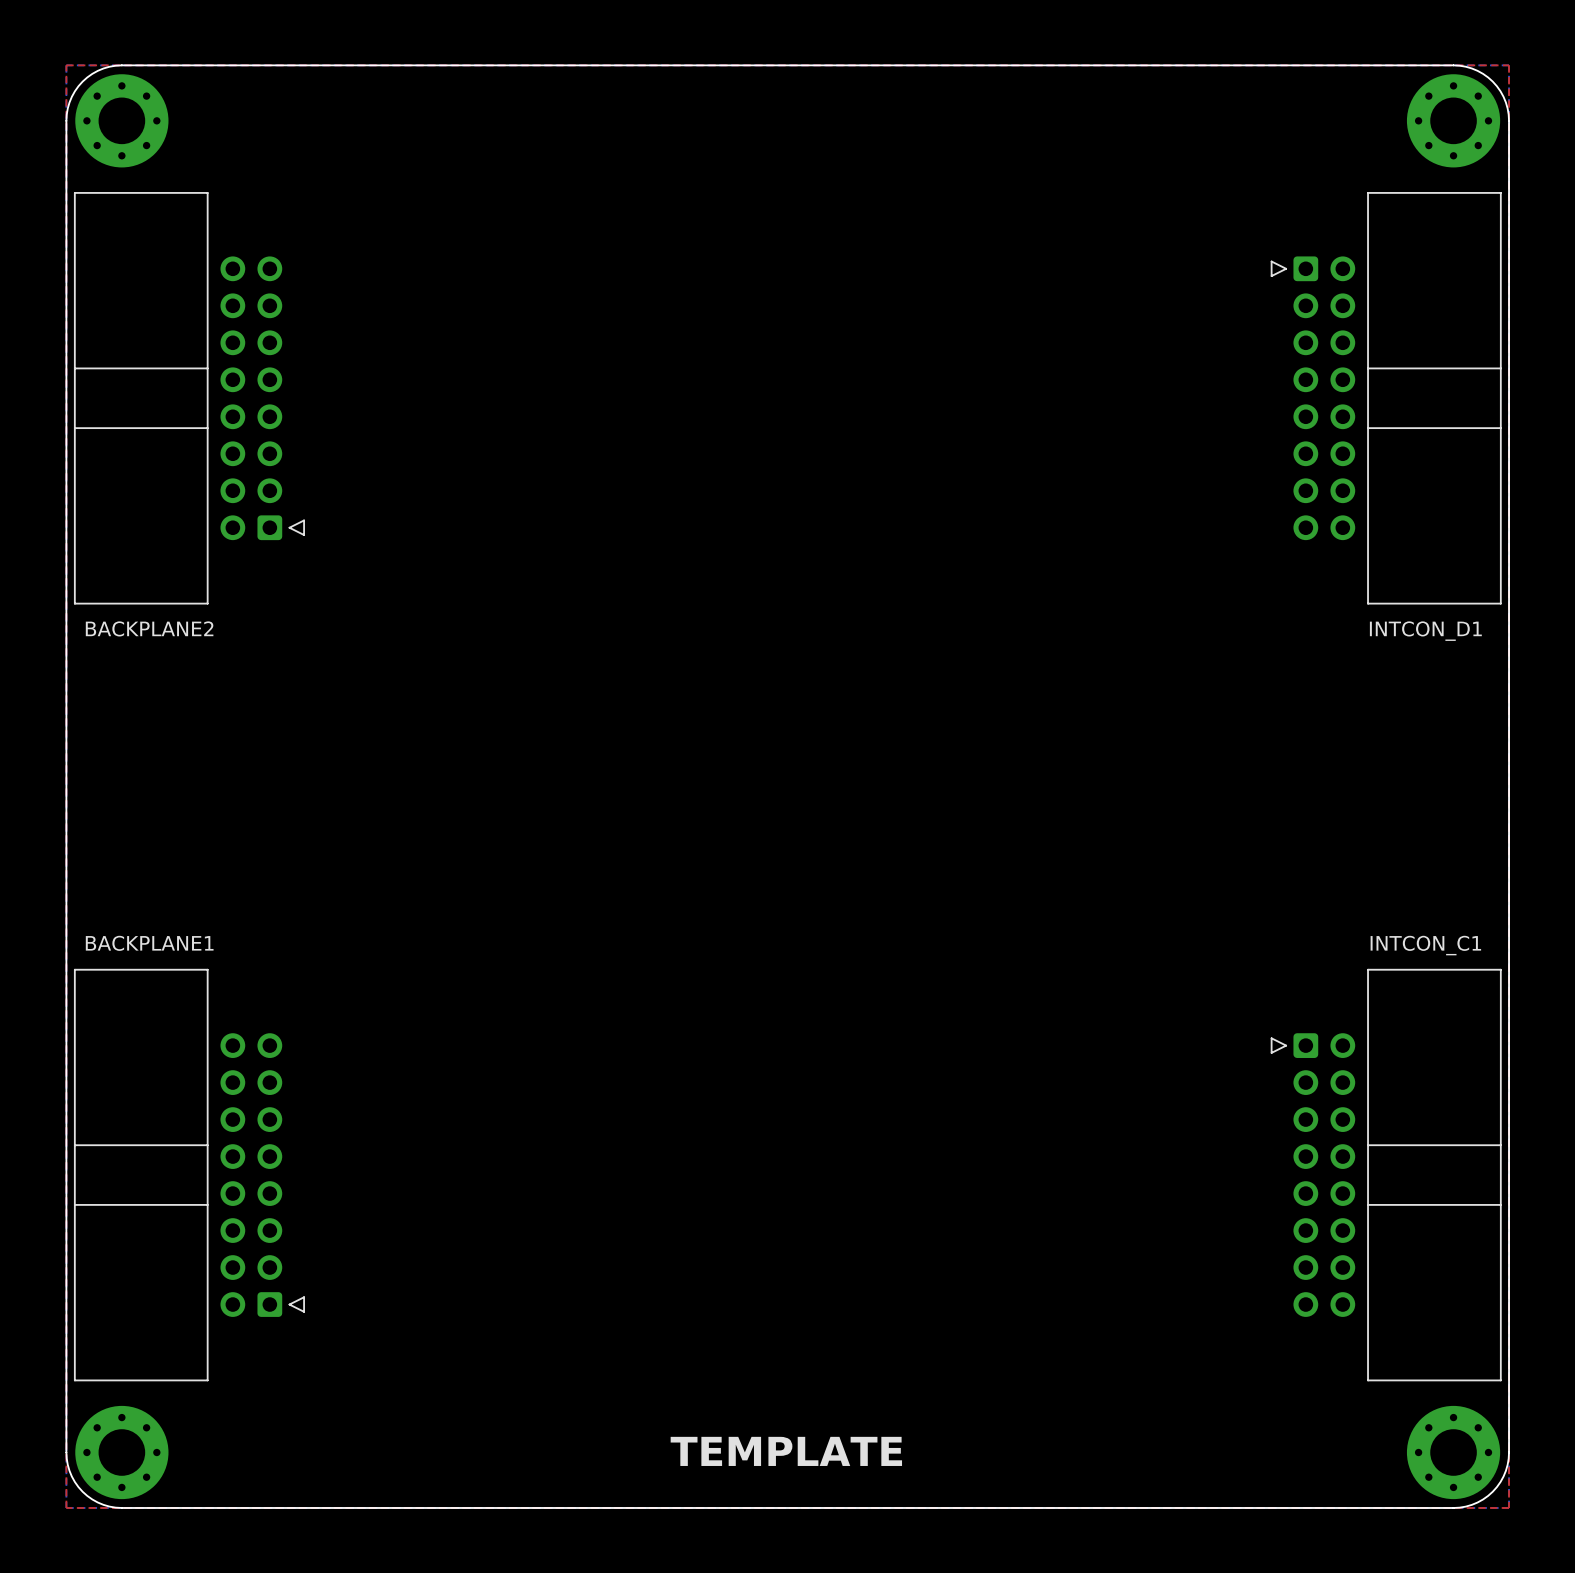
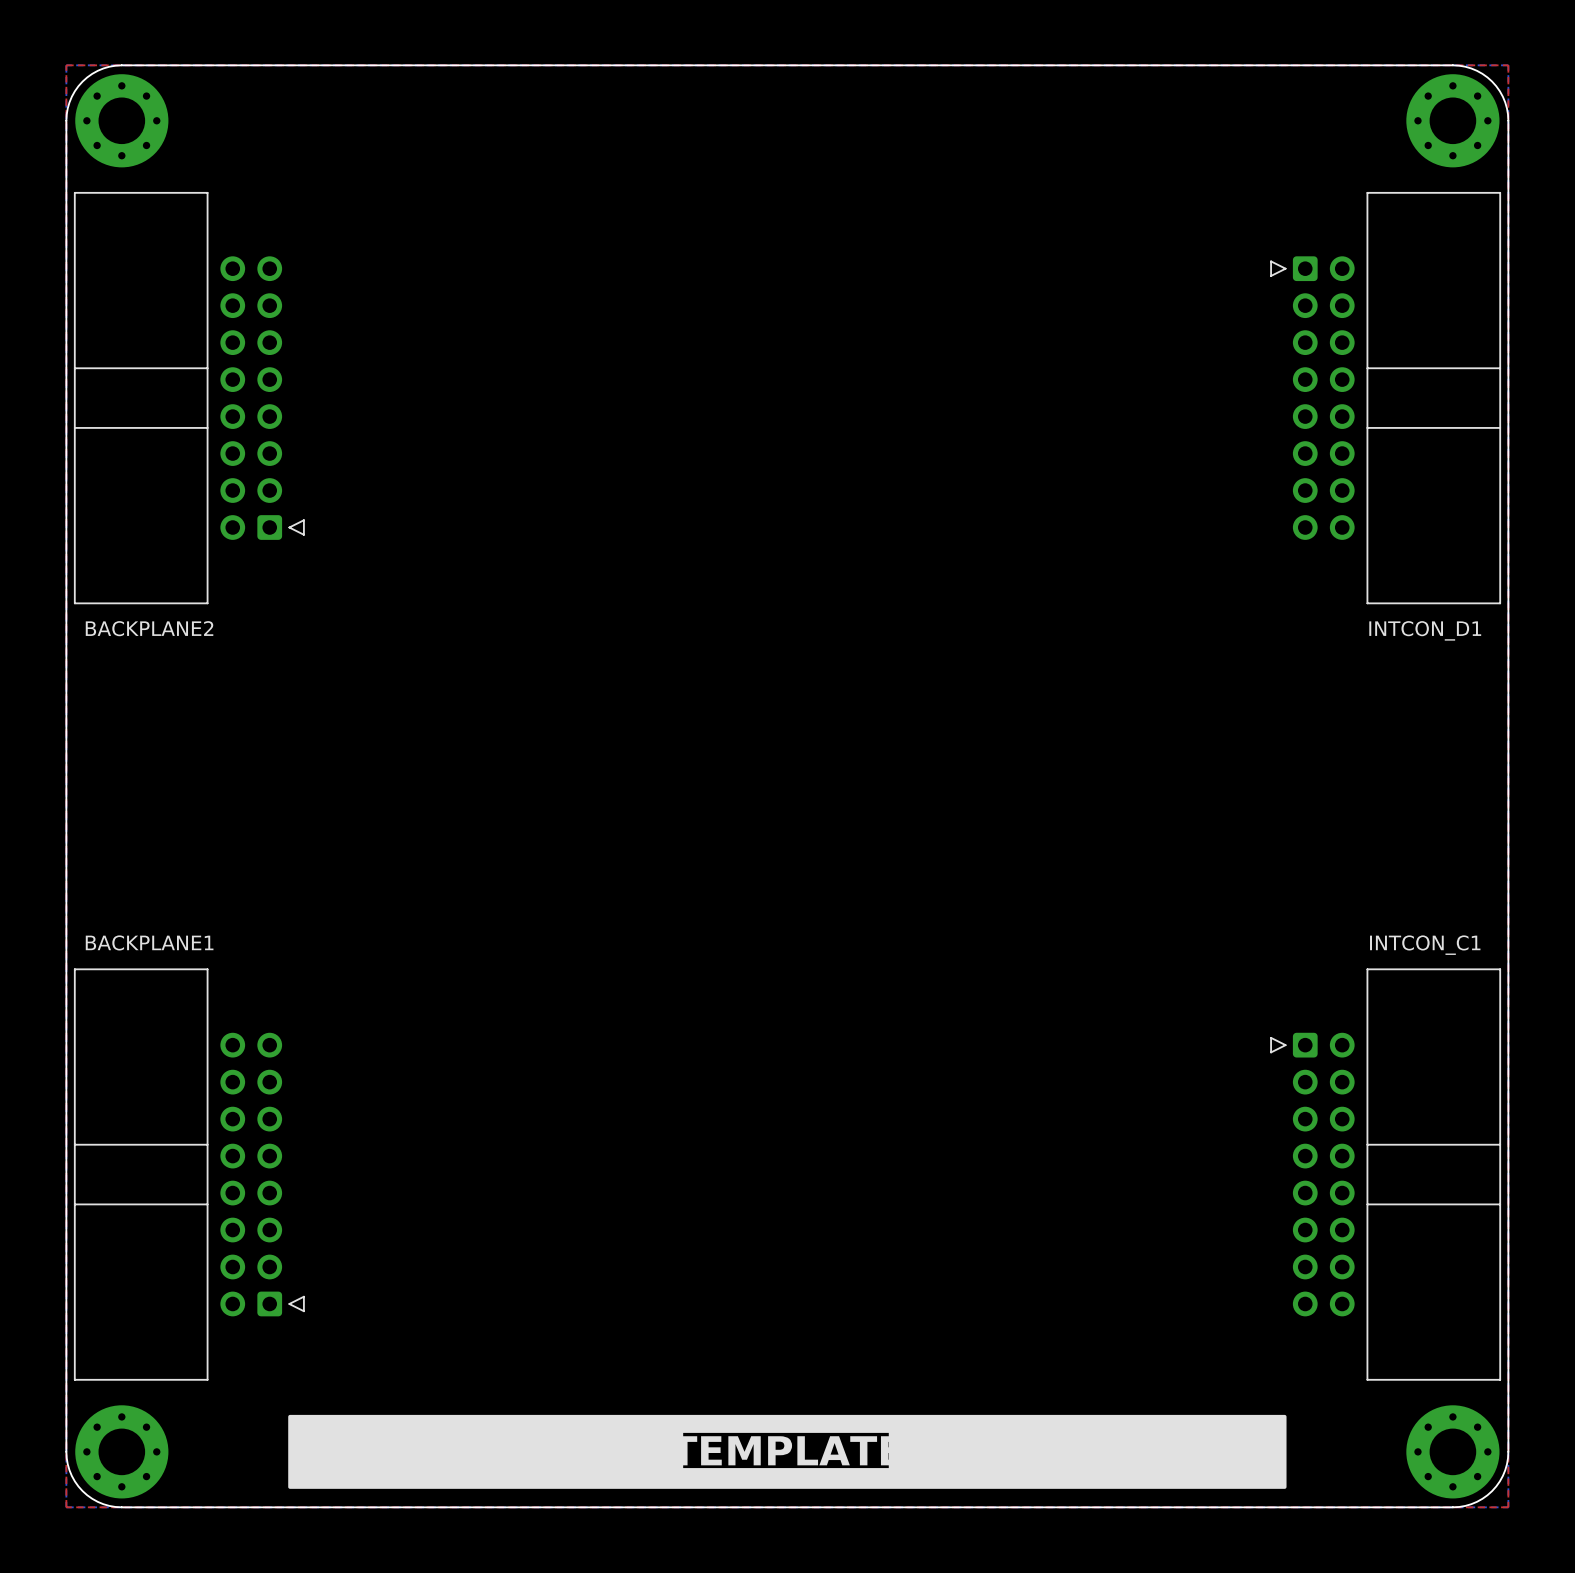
drawing: none -> [288, 1414, 1287, 1489]

